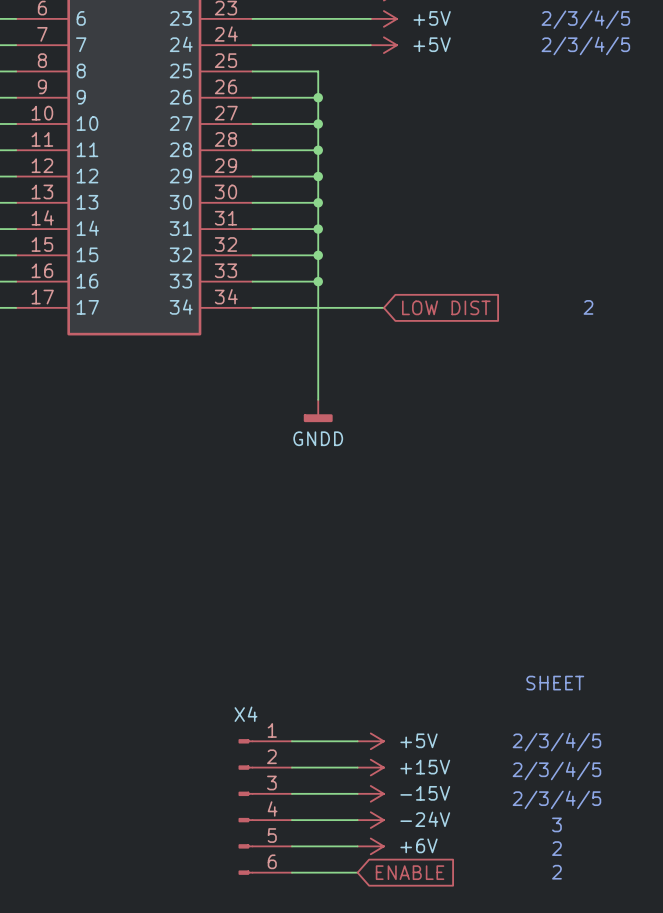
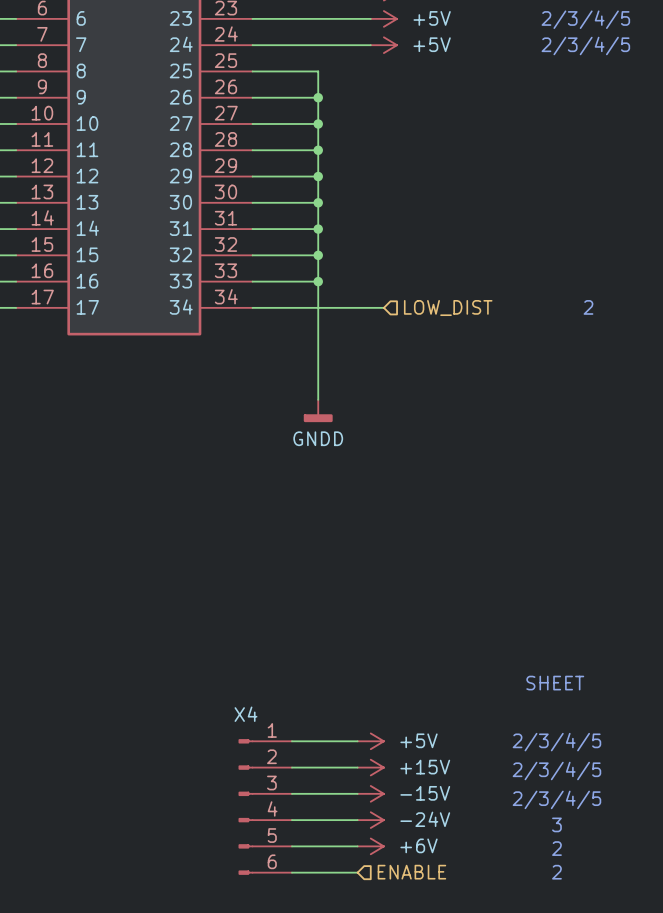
global label: LOW DIST (446, 307) -> none
hierarchical label: none -> LOW_DIST (448, 308)
global label: ENABLE (410, 872) -> none
hierarchical label: none -> ENABLE (411, 872)

